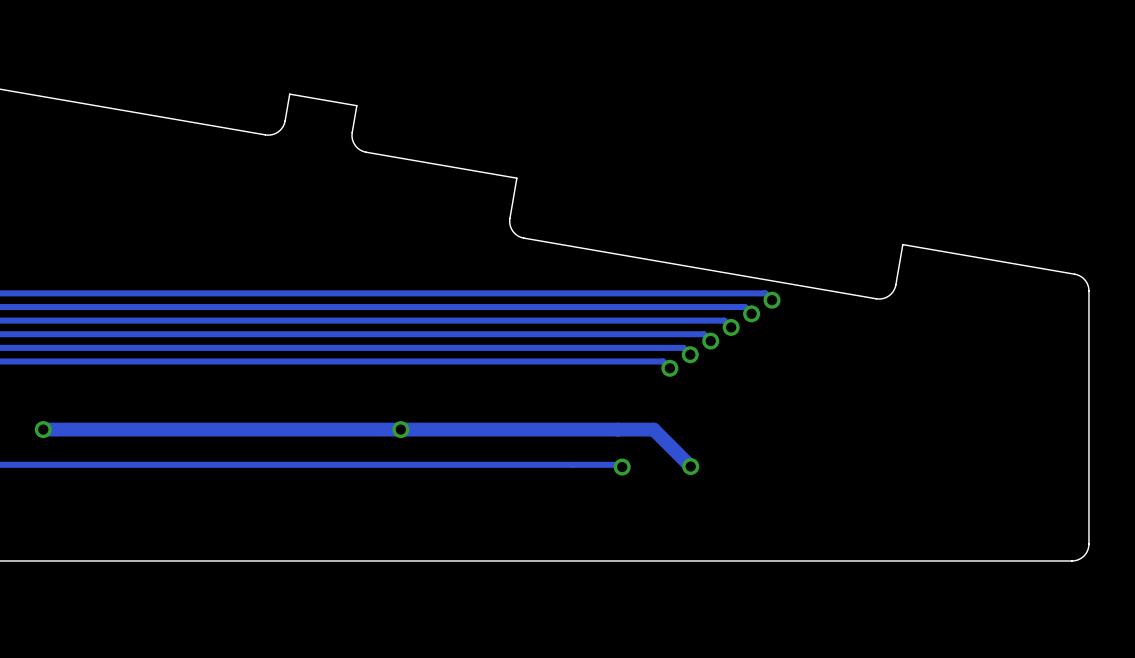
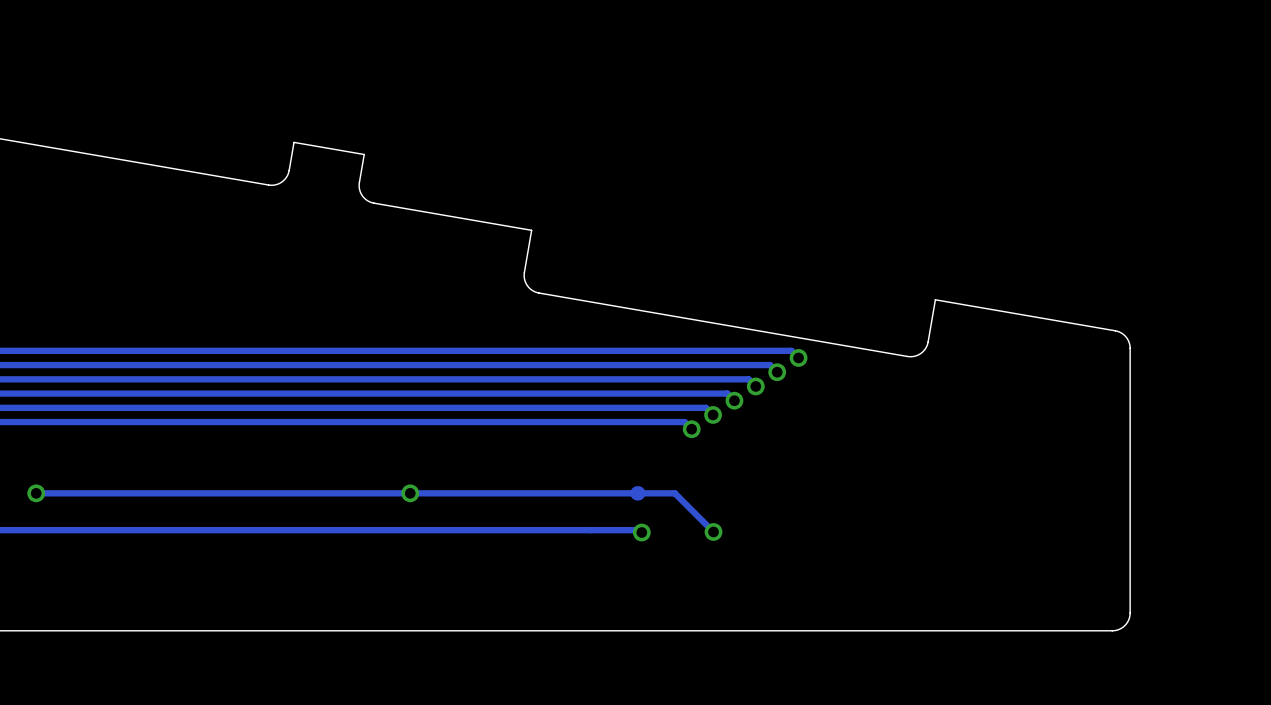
track width: thick (618, 429) (653, 429) (690, 466) -> thin (638, 493) (674, 493) (713, 531)
track width: thick (618, 429) (43, 429) -> thin (637, 493) (36, 493)

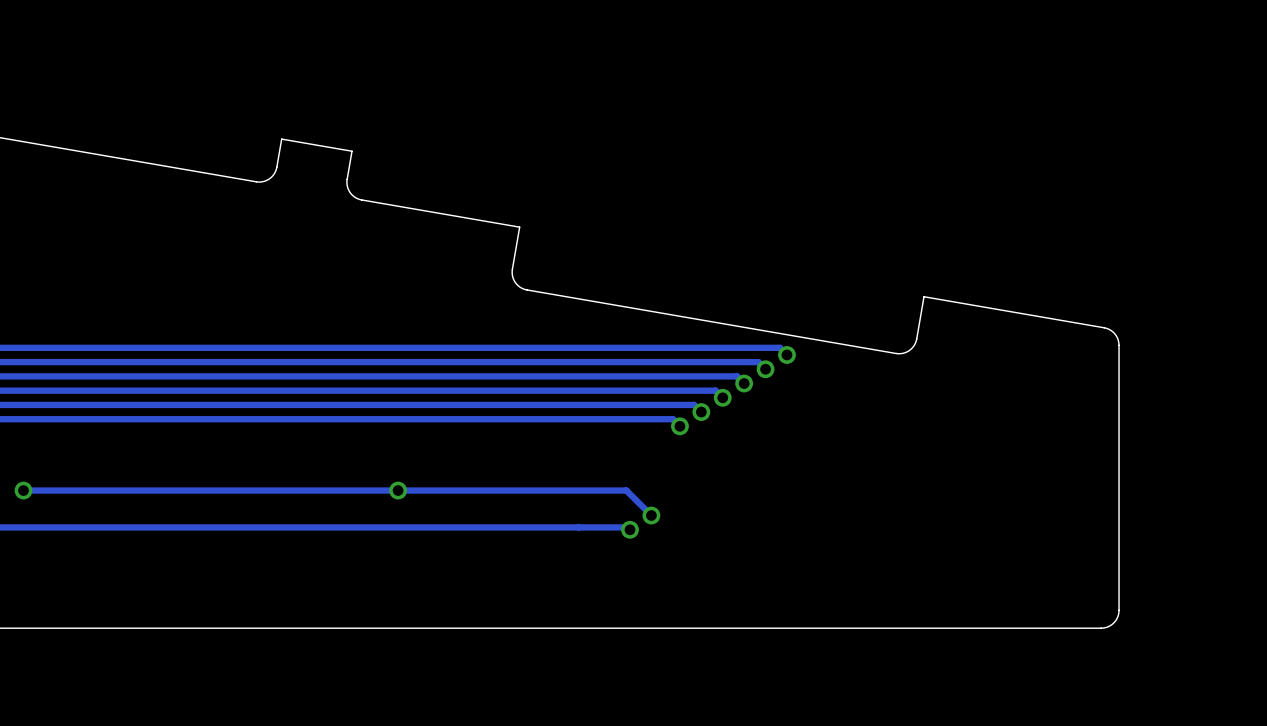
track: (637, 493) (674, 493) (713, 531) -> (626, 490) (651, 515)
via position: (713, 531) -> (651, 515)

